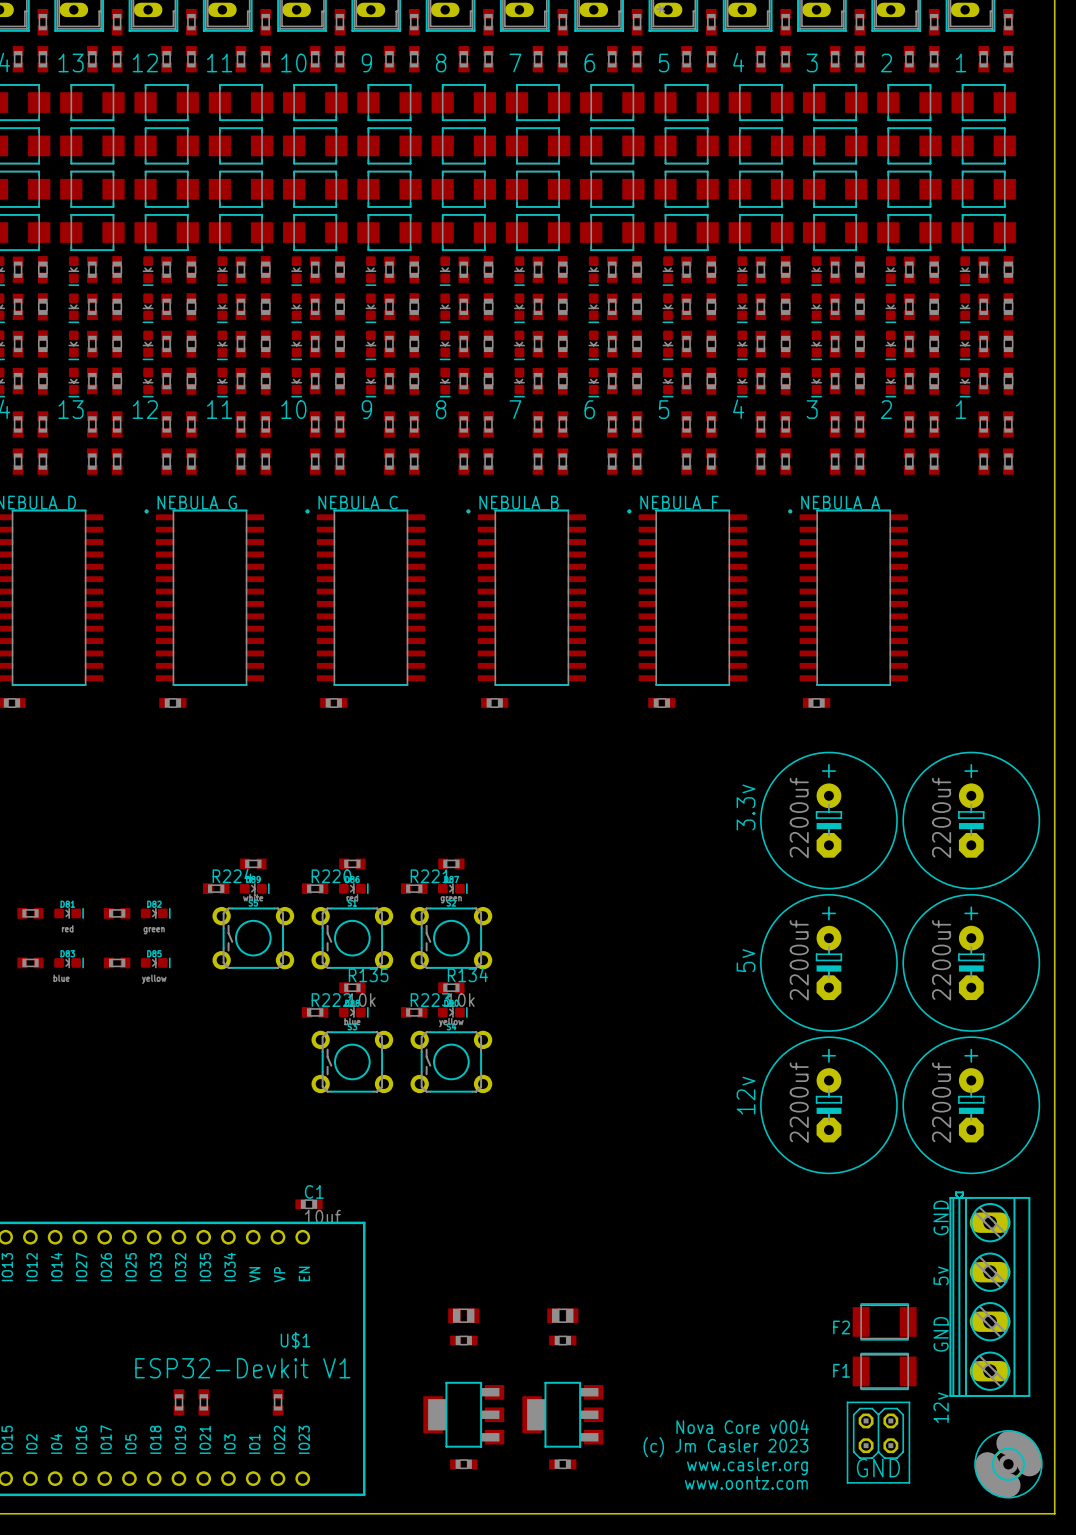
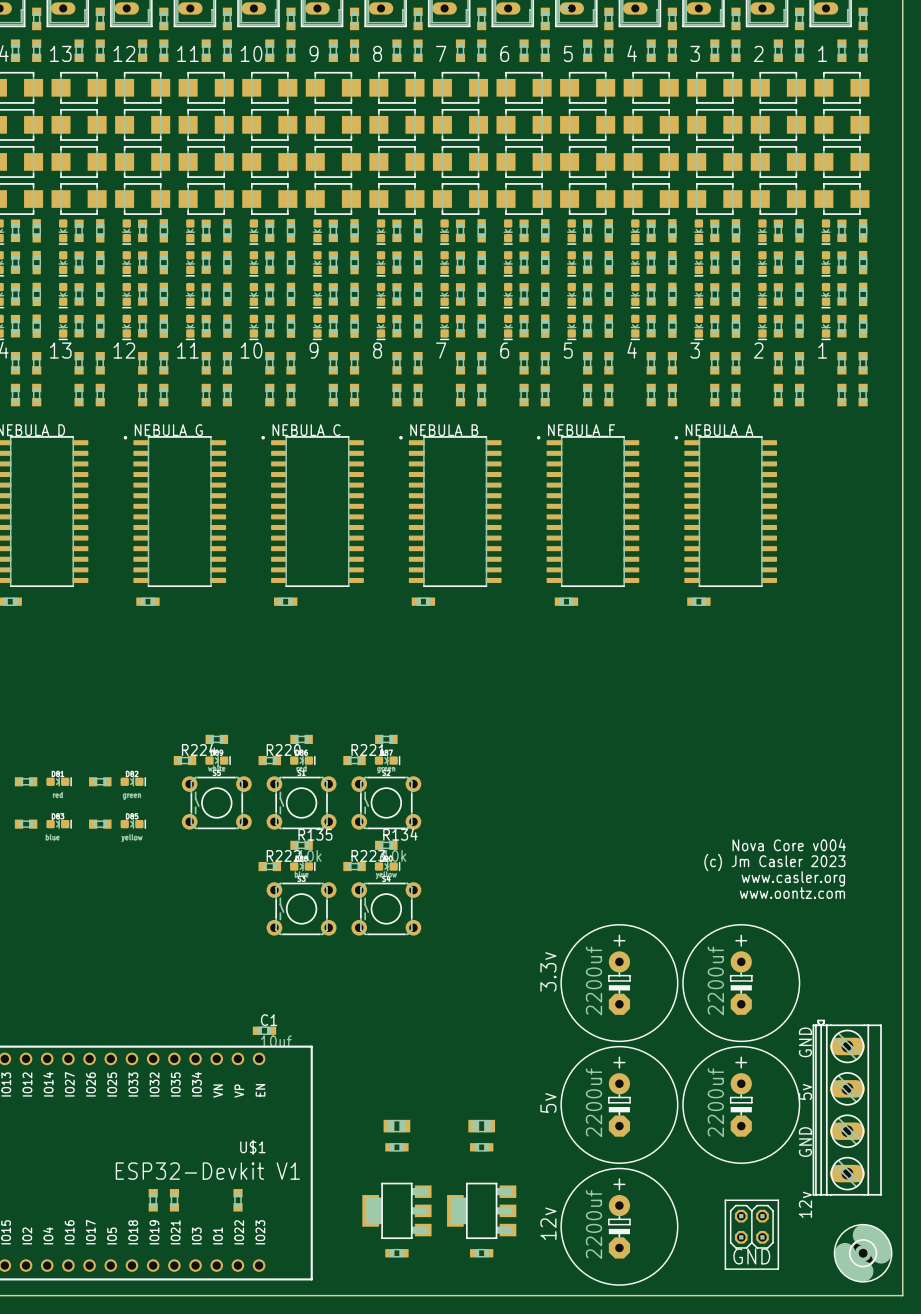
text: 3.3v (746, 807) -> none
part: 2200uf (828, 820) -> none
part: 2200uf (971, 820) -> none
text: 5v (746, 960) -> none
part: 2200uf (828, 962) -> none
part: 2200uf (971, 962) -> none
text: none -> Nova Core v004 (789, 845)
text: none -> (c) Jm Casler 2023 (774, 862)
text: none -> www.casler.org (793, 878)
text: none -> www.oontz.com (792, 893)
text: 12v (746, 1095) -> none
part: 2200uf (828, 1105) -> none
part: 2200uf (971, 1105) -> none
text: none -> 3.3v (548, 971)
part: none -> 2200uf (619, 983)
part: none -> 2200uf (741, 983)
text: none -> 5v (548, 1102)
part: none -> 2200uf (619, 1104)
part: none -> 2200uf (741, 1104)
F2: (884, 1321) -> none
F1: (884, 1371) -> none
text: Nova Core v004 (742, 1426) -> none
text: none -> 12v (548, 1223)
part: none -> 2200uf (619, 1226)
text: (c) Jm Casler 2023 (725, 1447) -> none
text: www.casler.org (747, 1466) -> none
text: www.oontz.com (746, 1482) -> none

